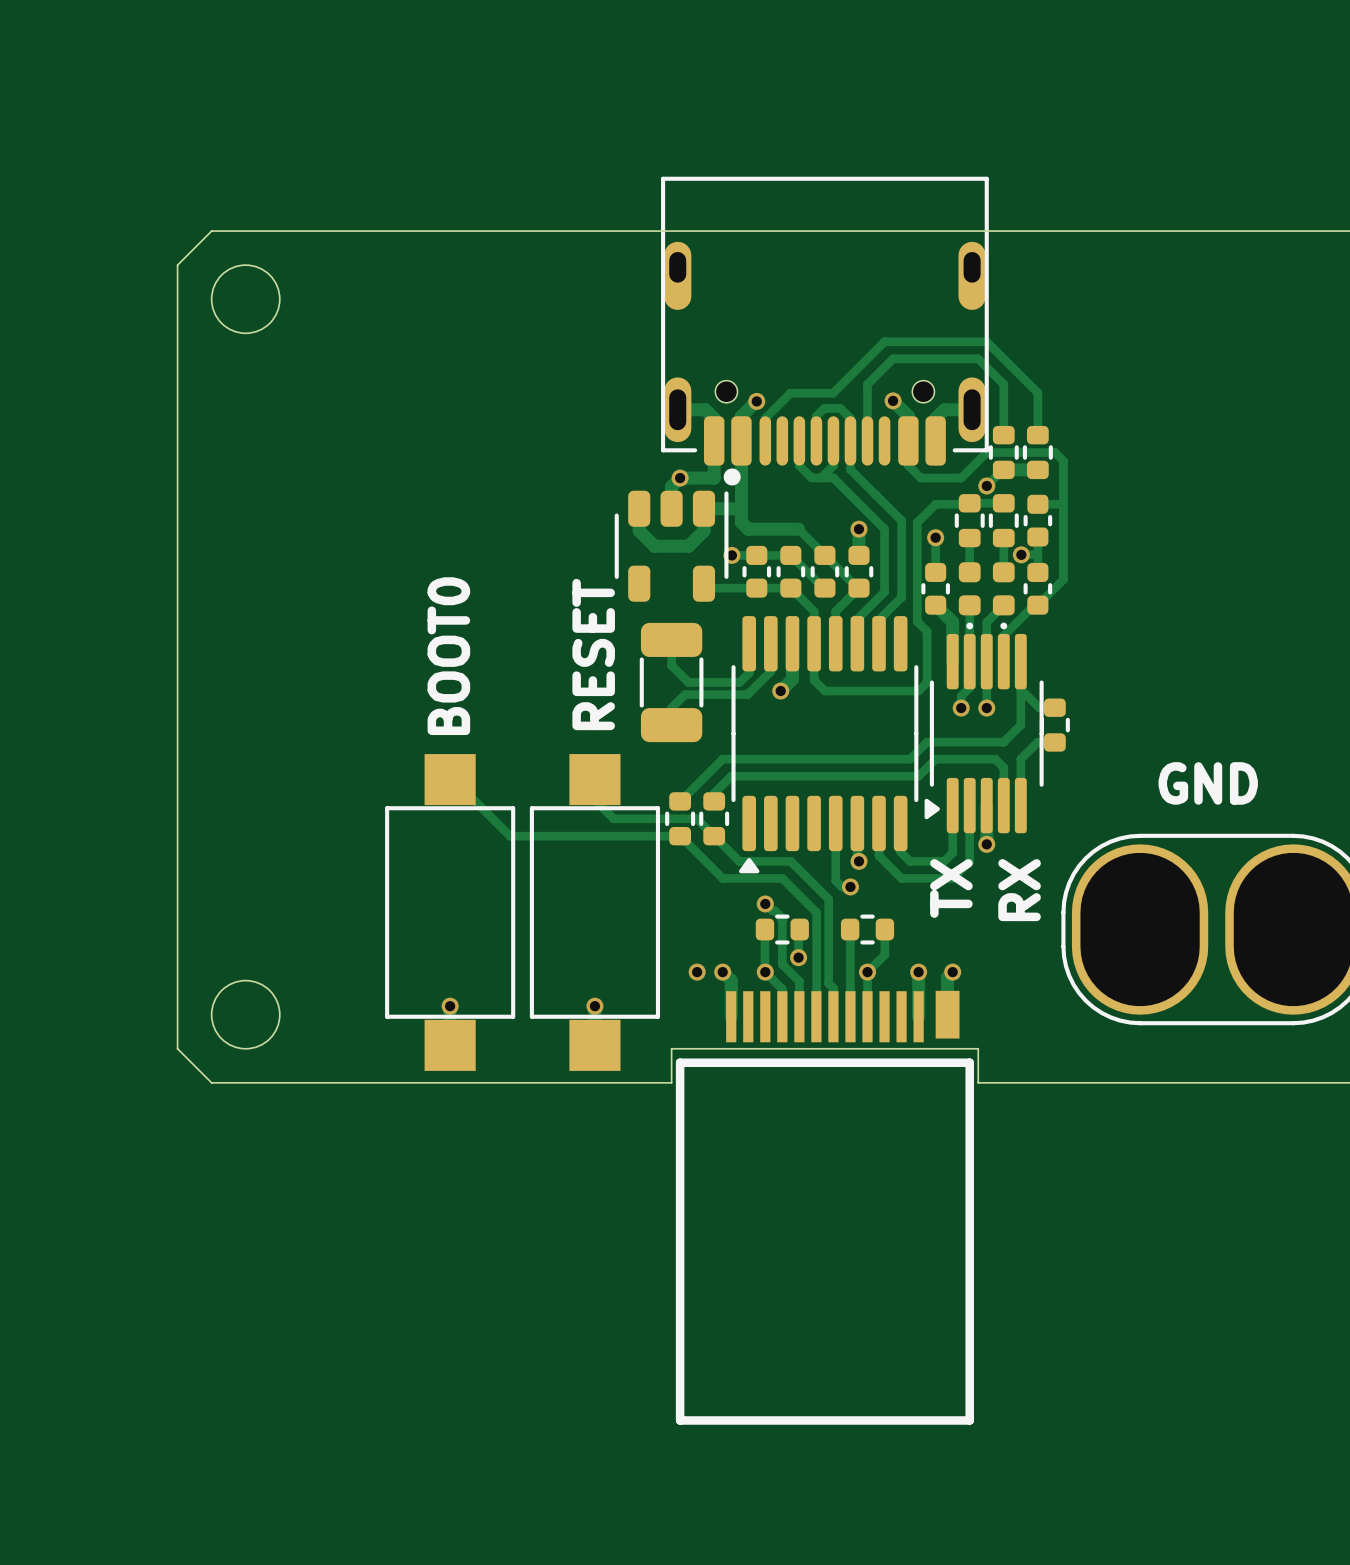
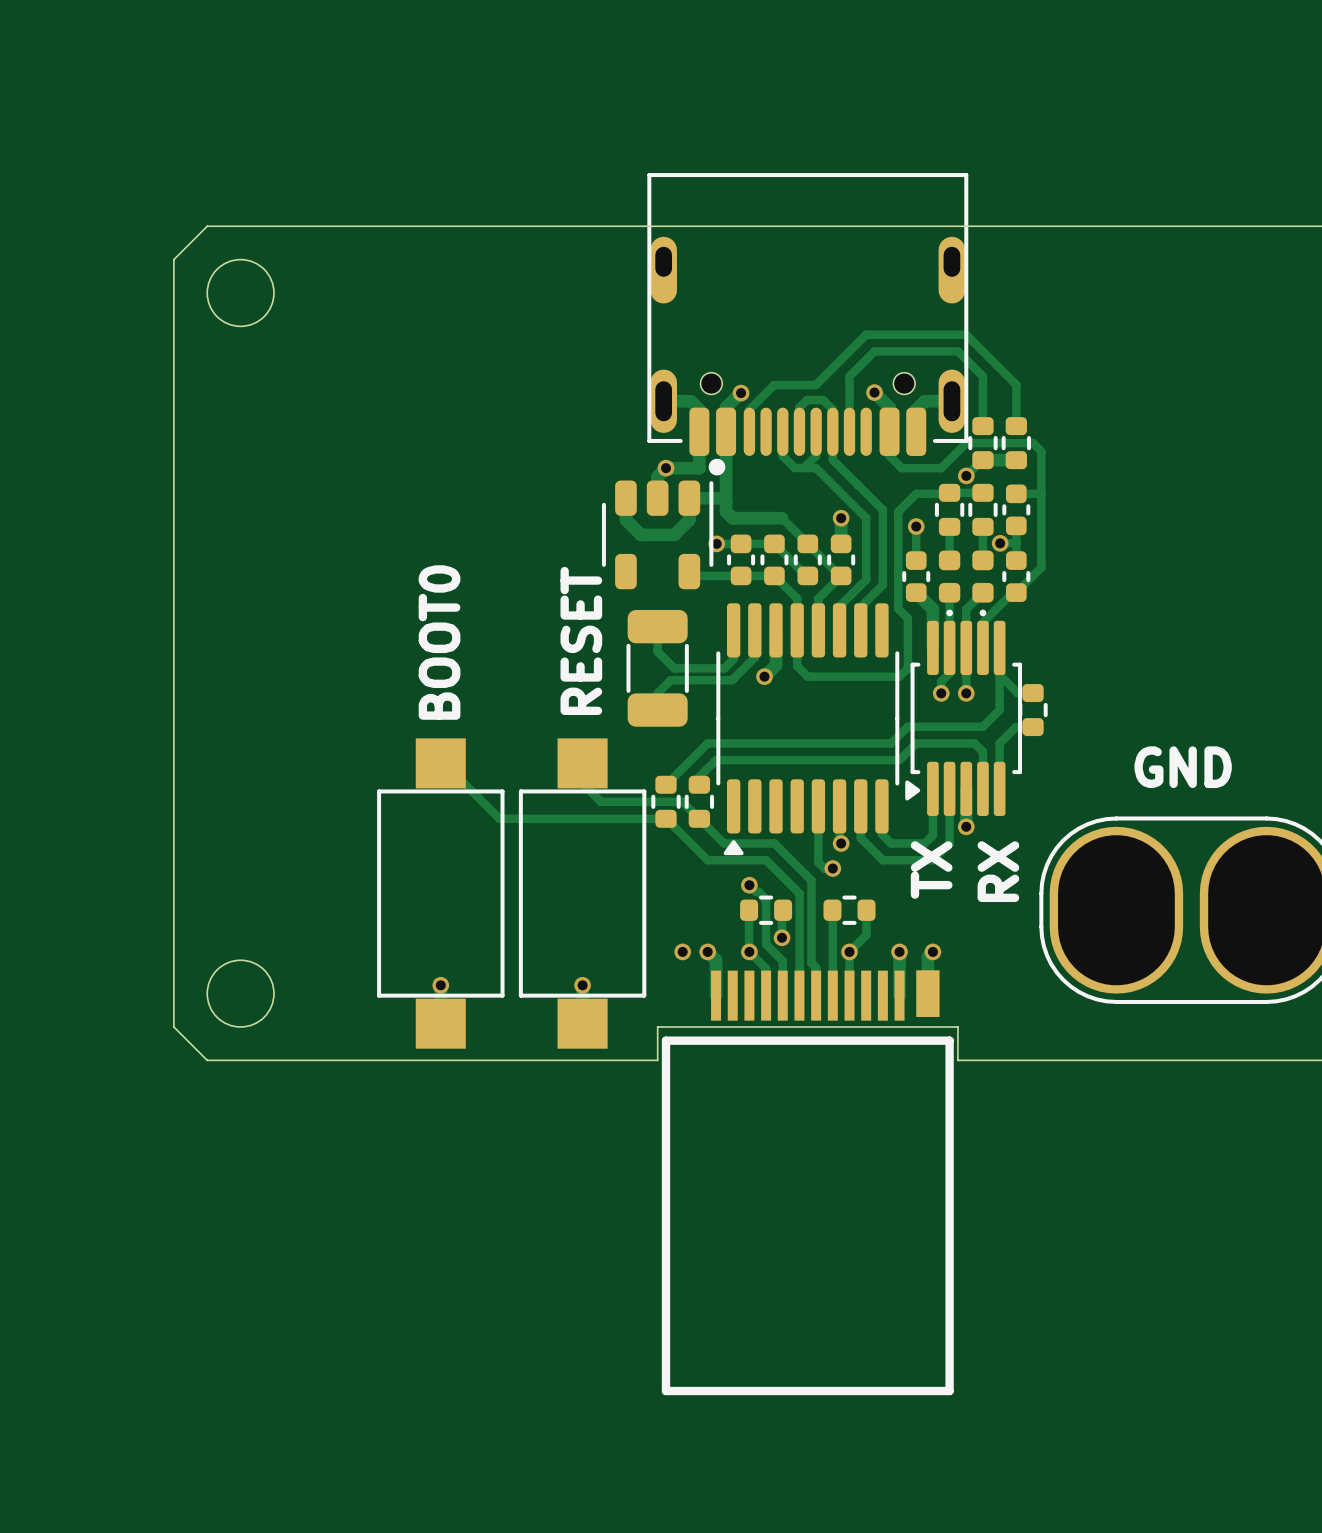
part footprint: [924, 633, 1044, 834] -> [905, 620, 1023, 816]

